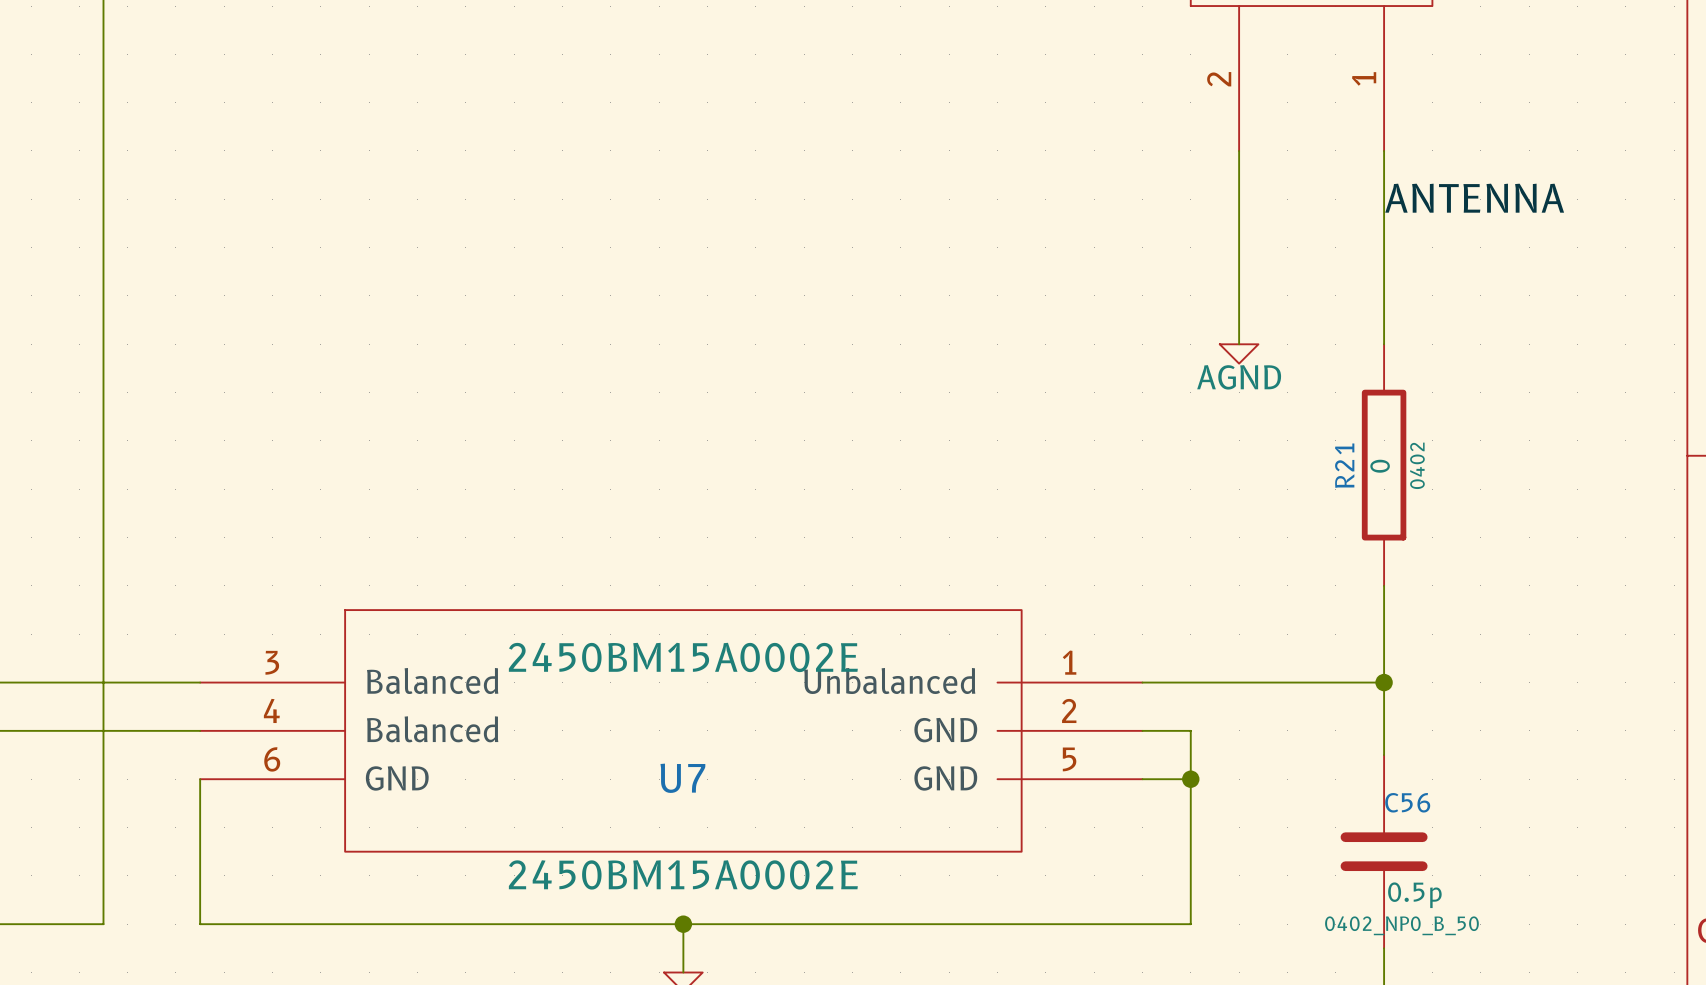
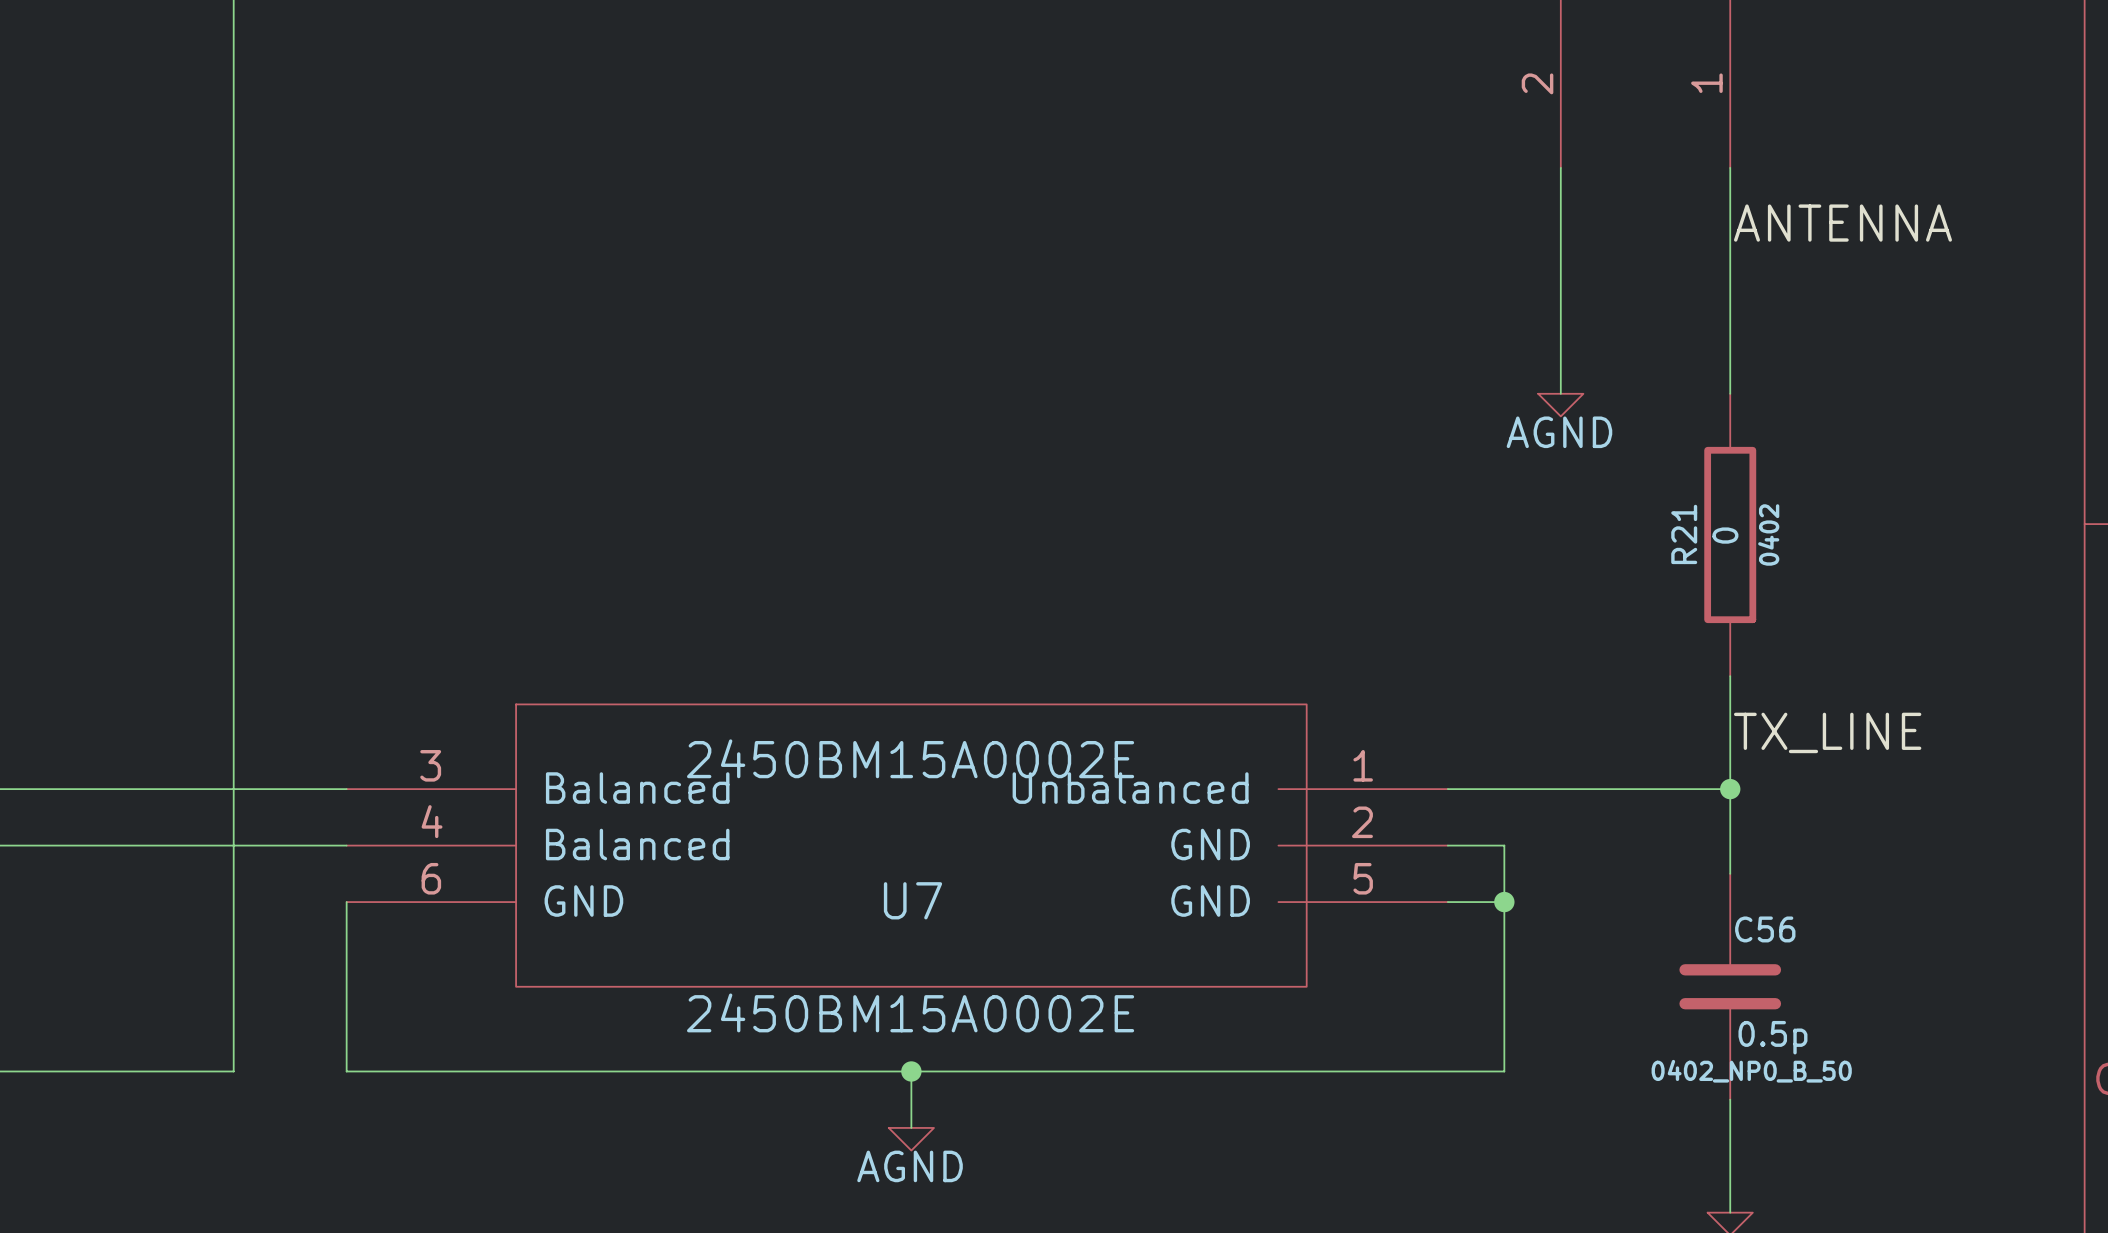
label: none -> TX_LINE (1827, 732)

